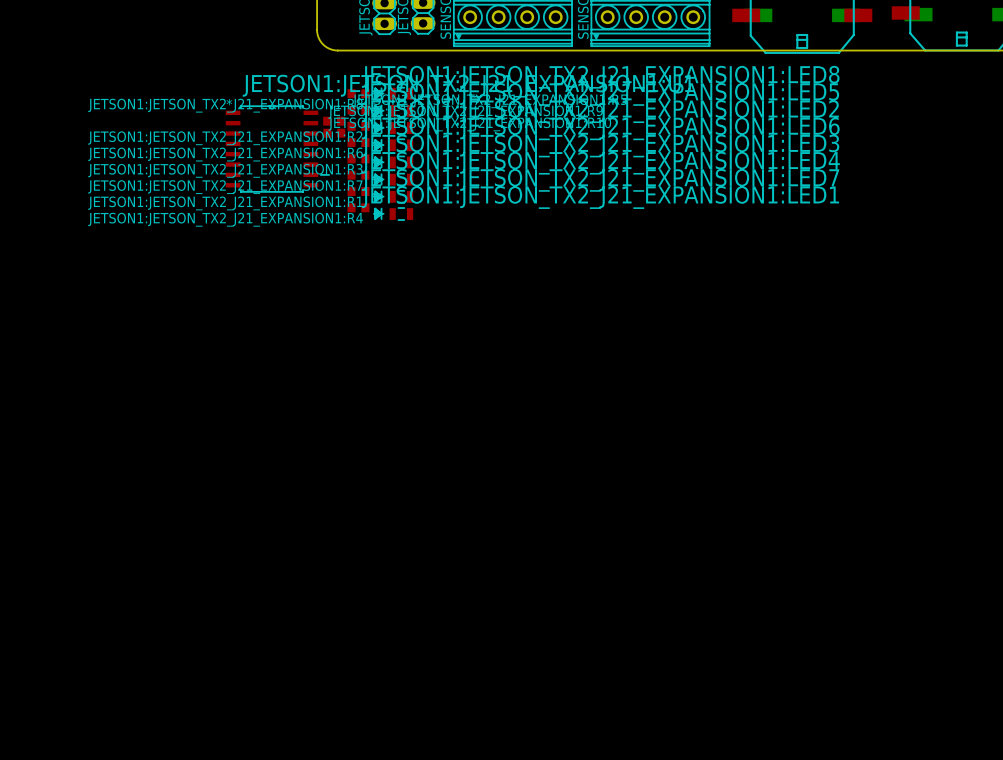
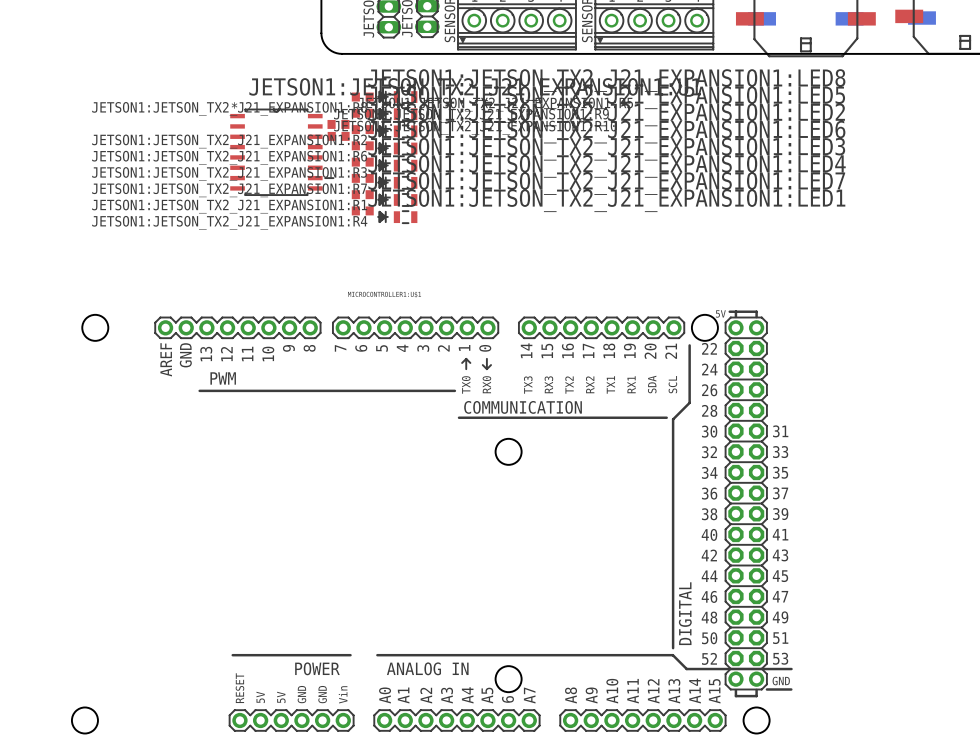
part: none -> (432, 522)

